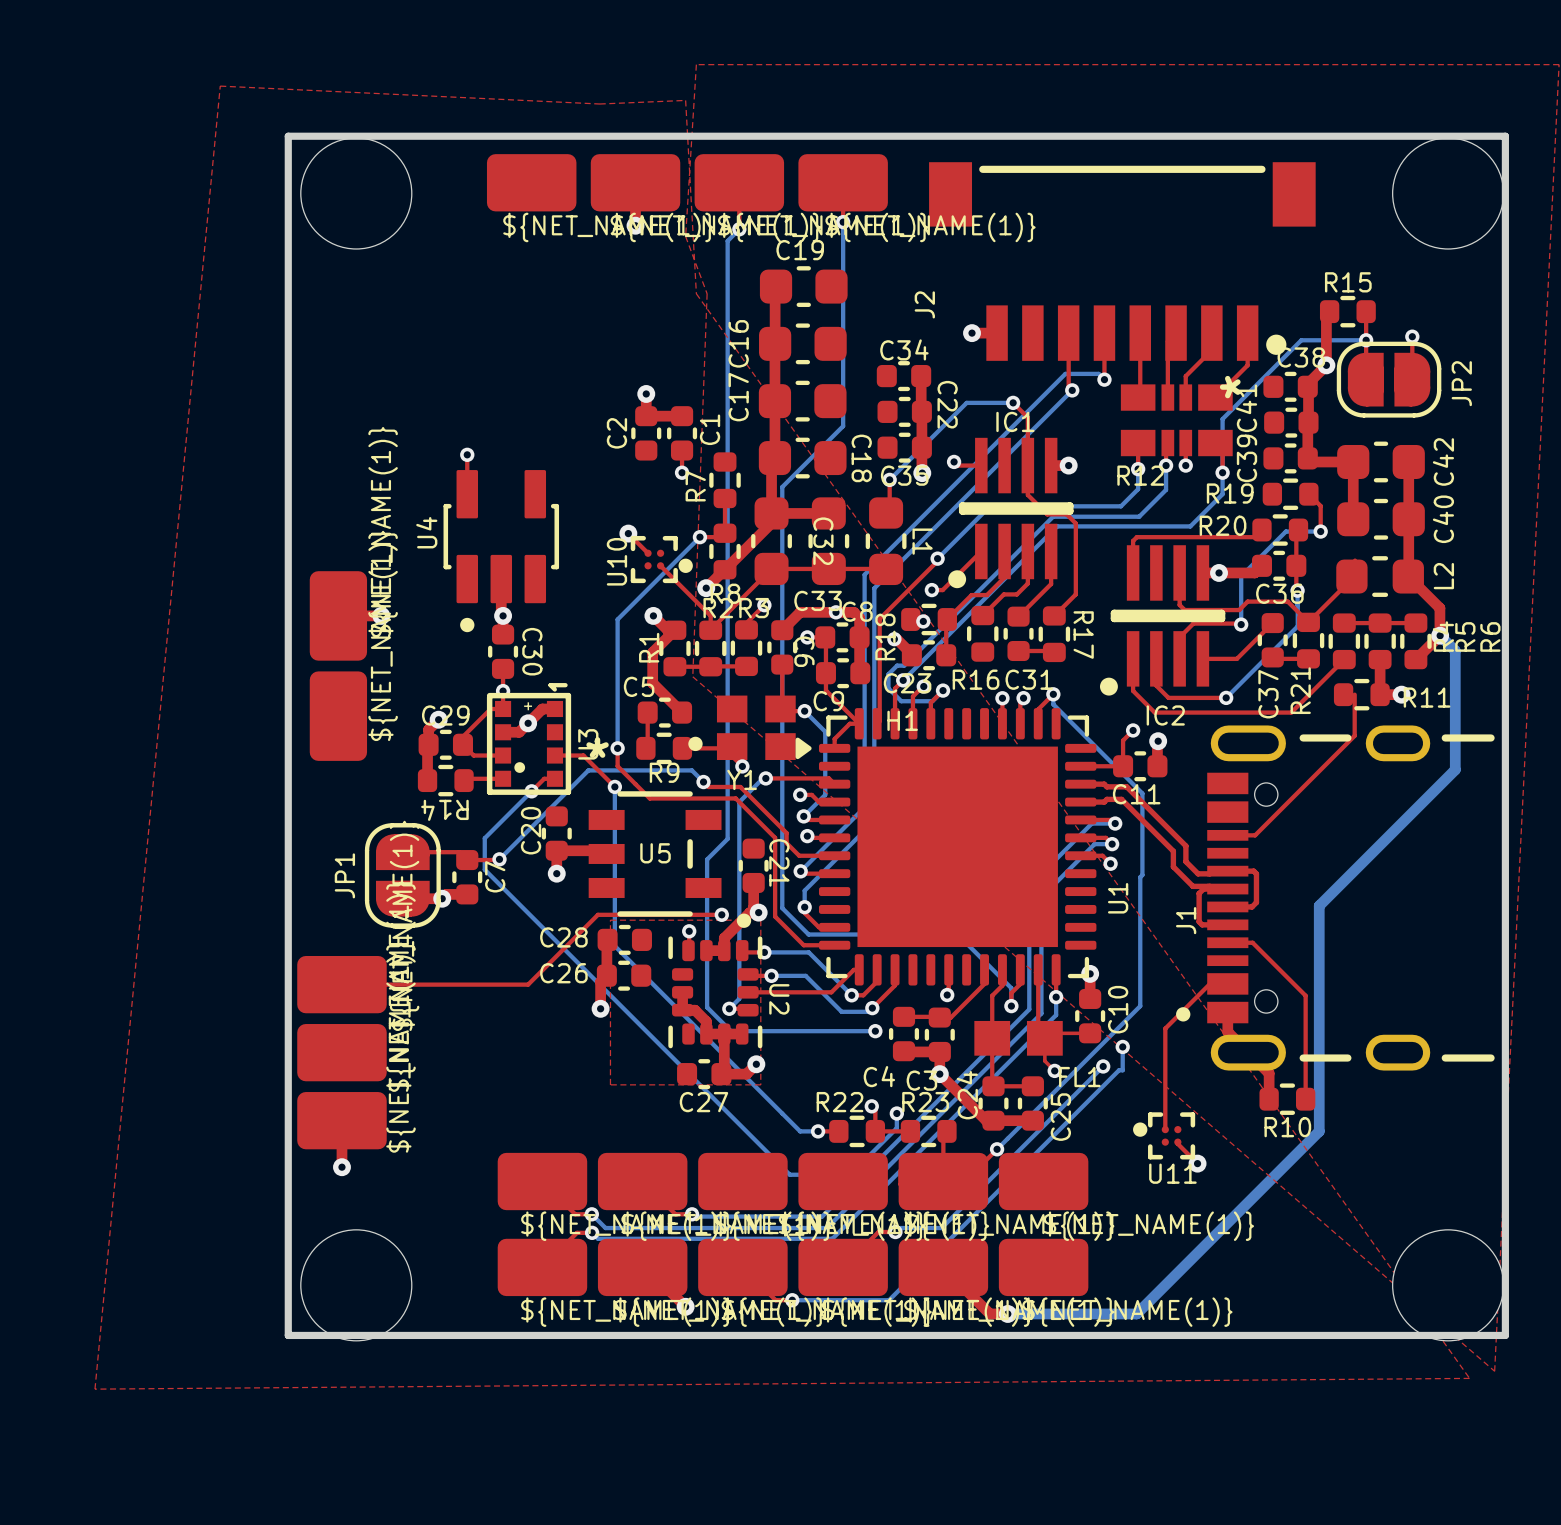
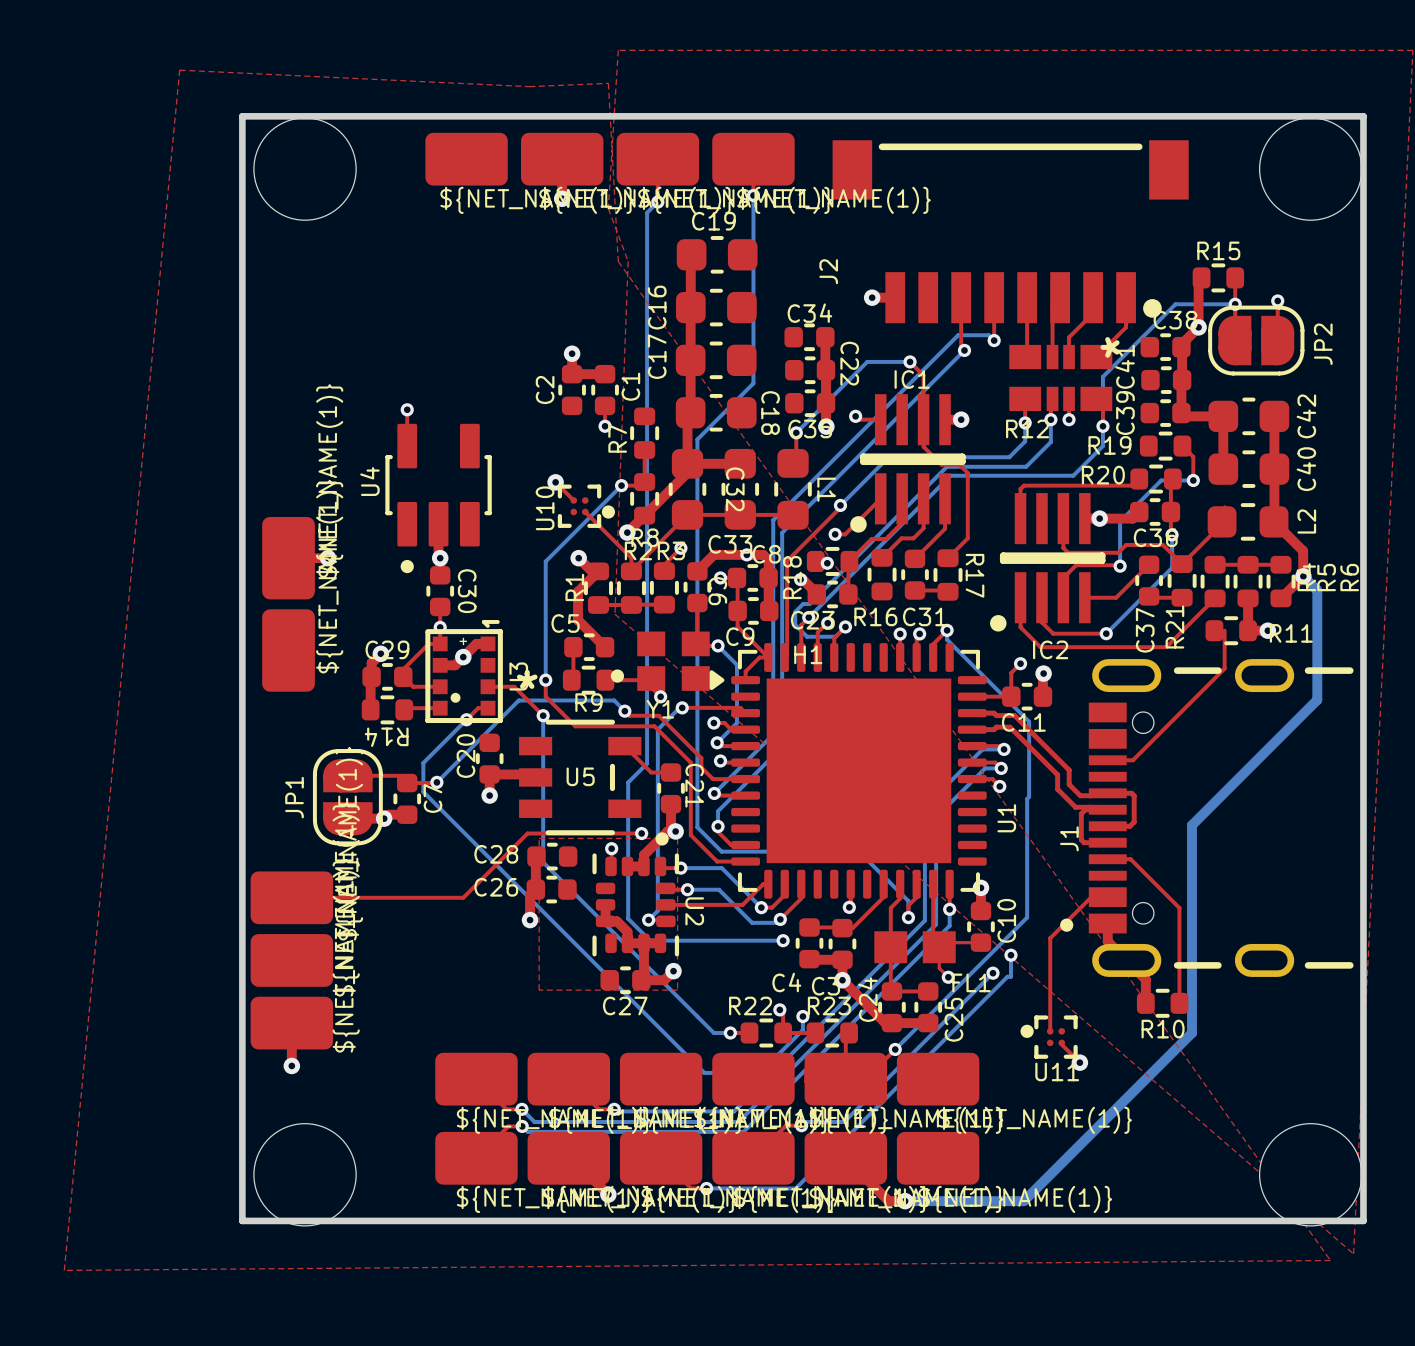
top track: none -> (624, 746) (651, 772) (671, 772)

